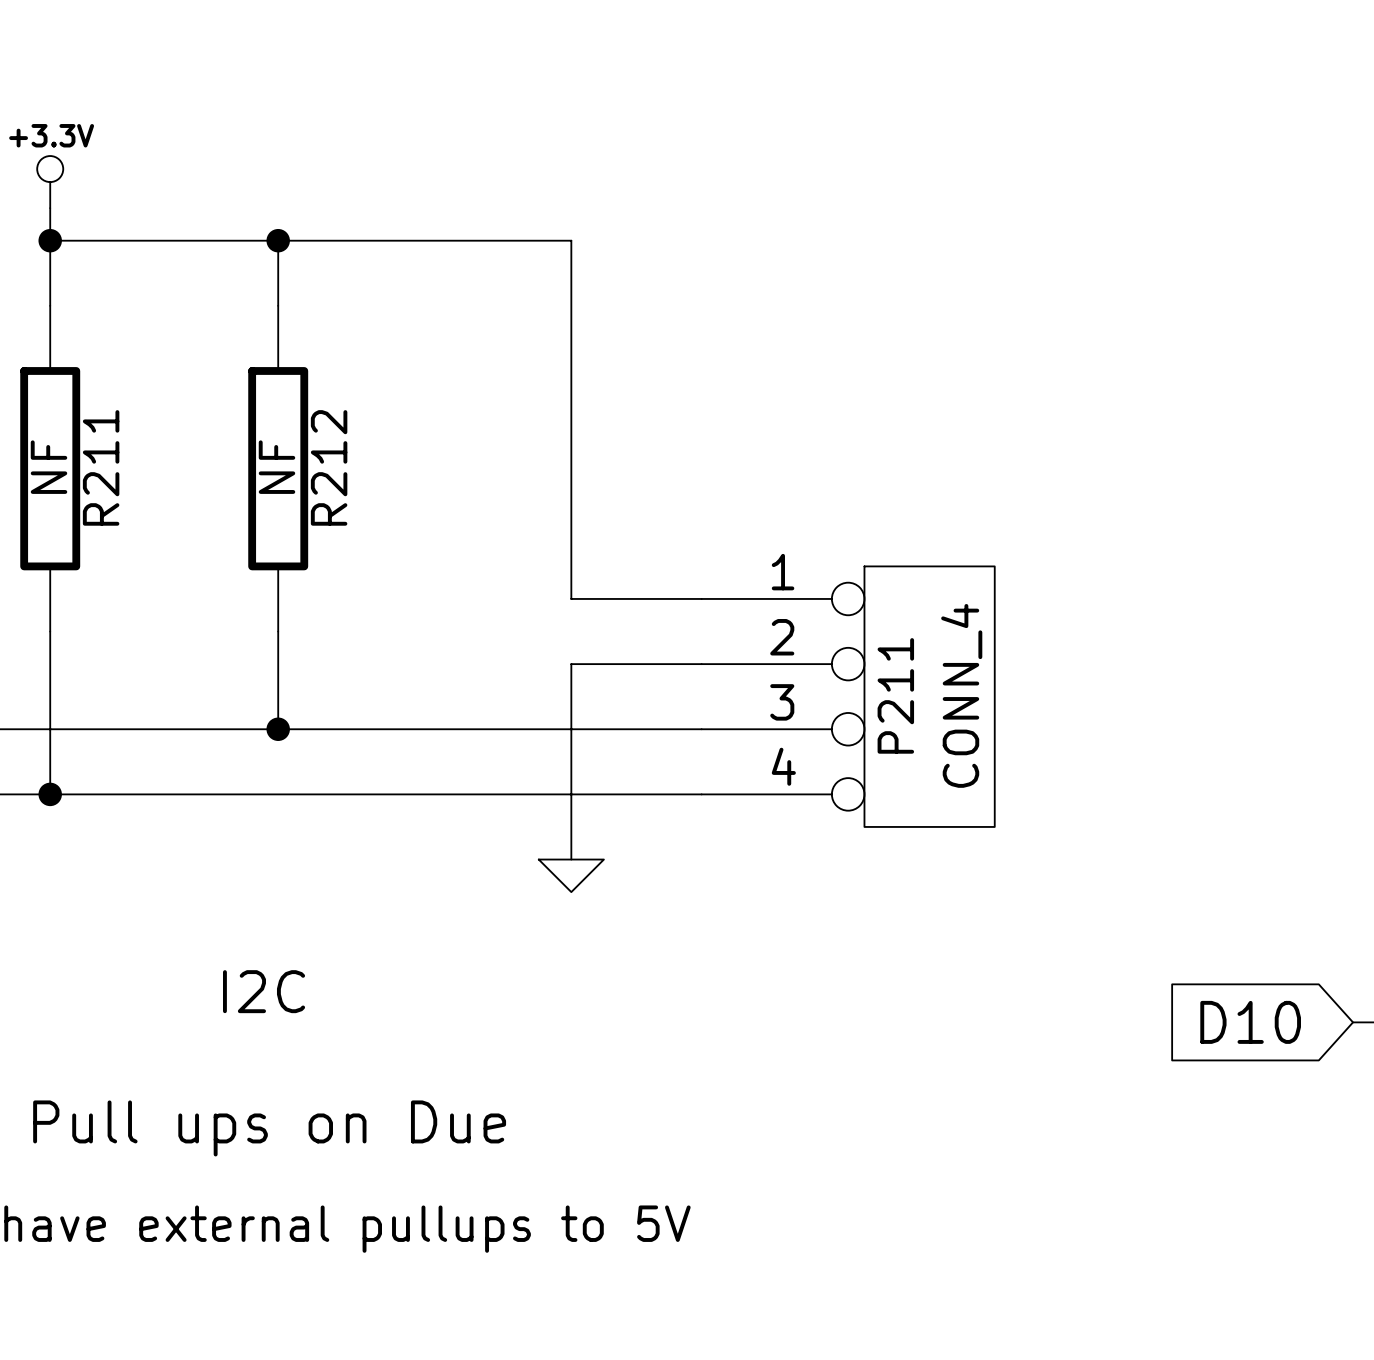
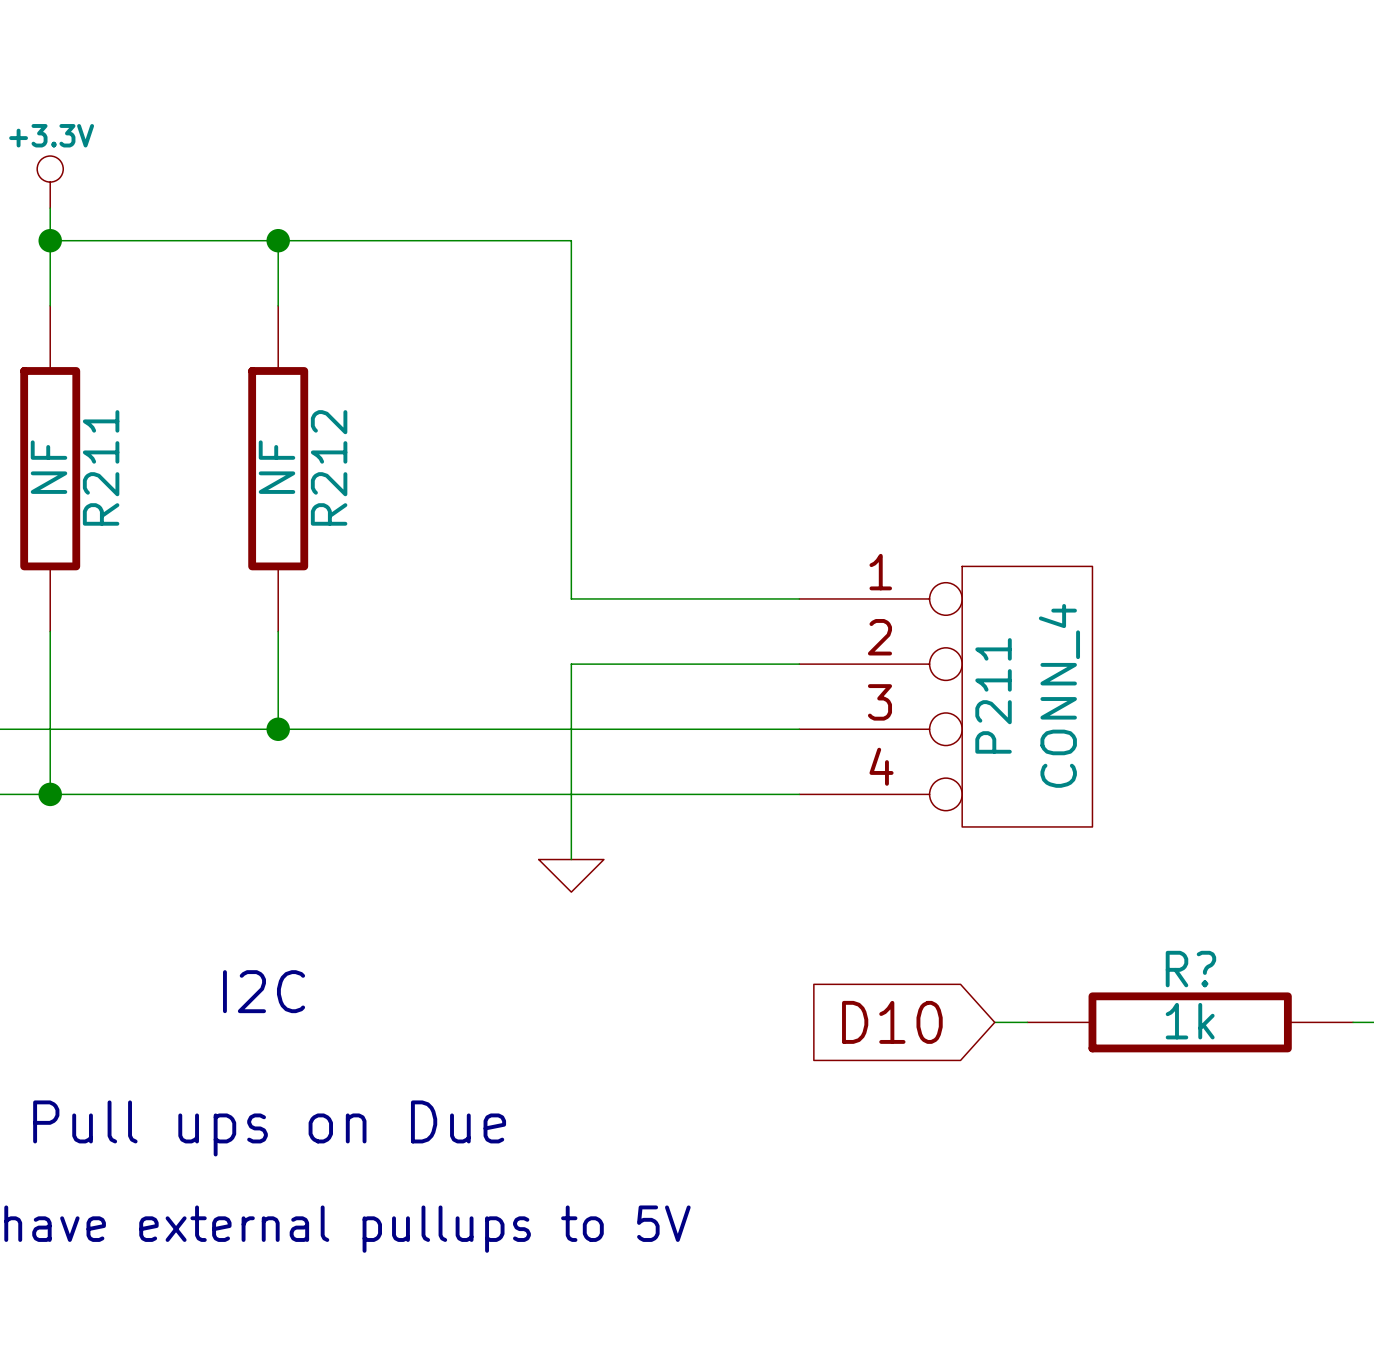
P211 position: (848, 696) -> (945, 696)
wire: none -> (994, 1022) (1027, 1022)
R?: none -> 1k (1190, 1022)
global label position: D10 (1250, 1022) -> D10 (892, 1022)

